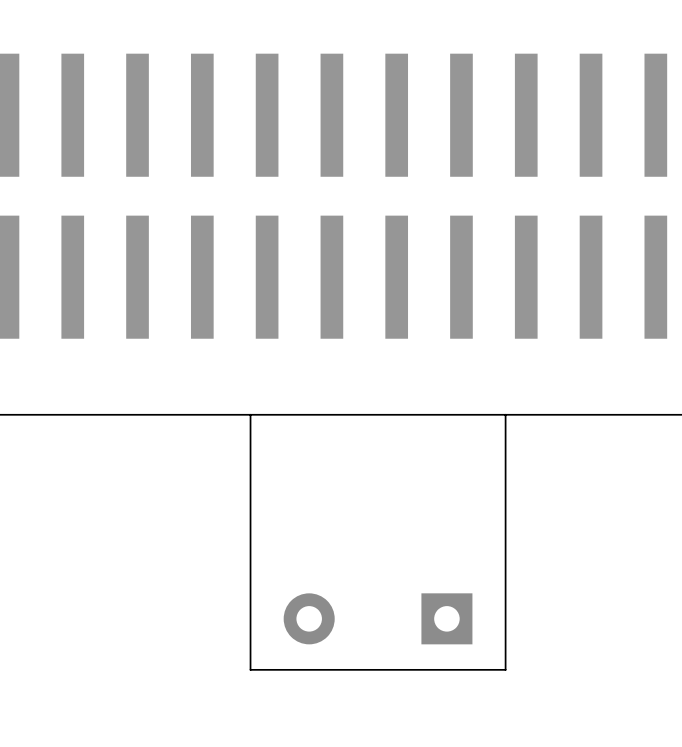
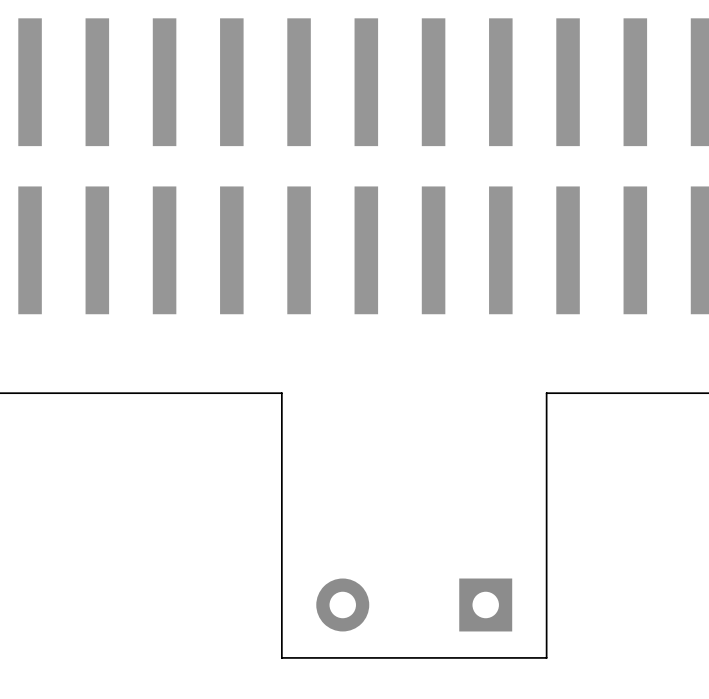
board edge: (250, 414) (505, 414) -> none

